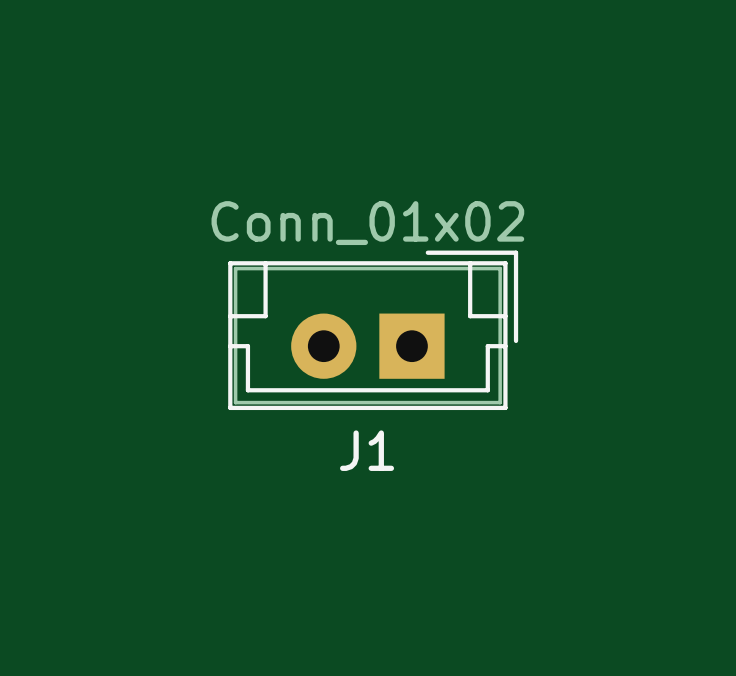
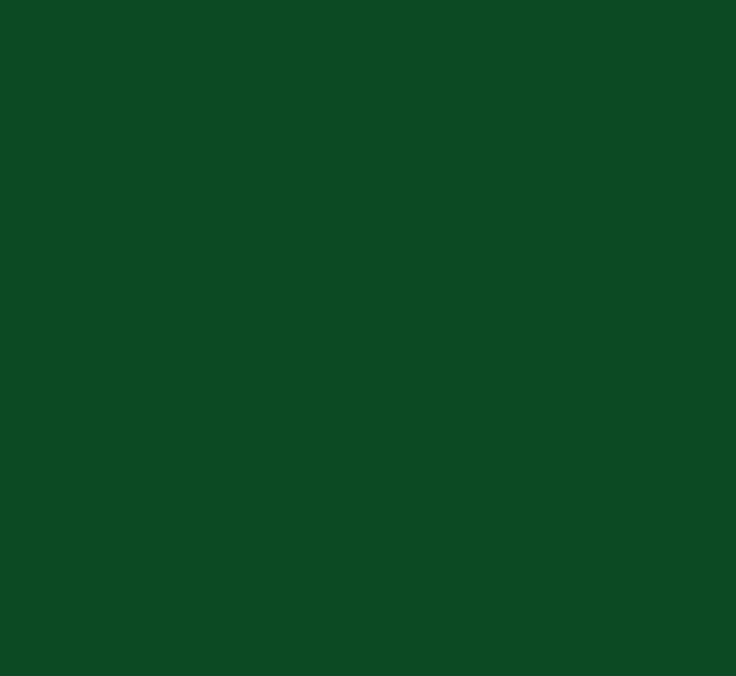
J1: Conn_01x02 (373, 330) -> none

